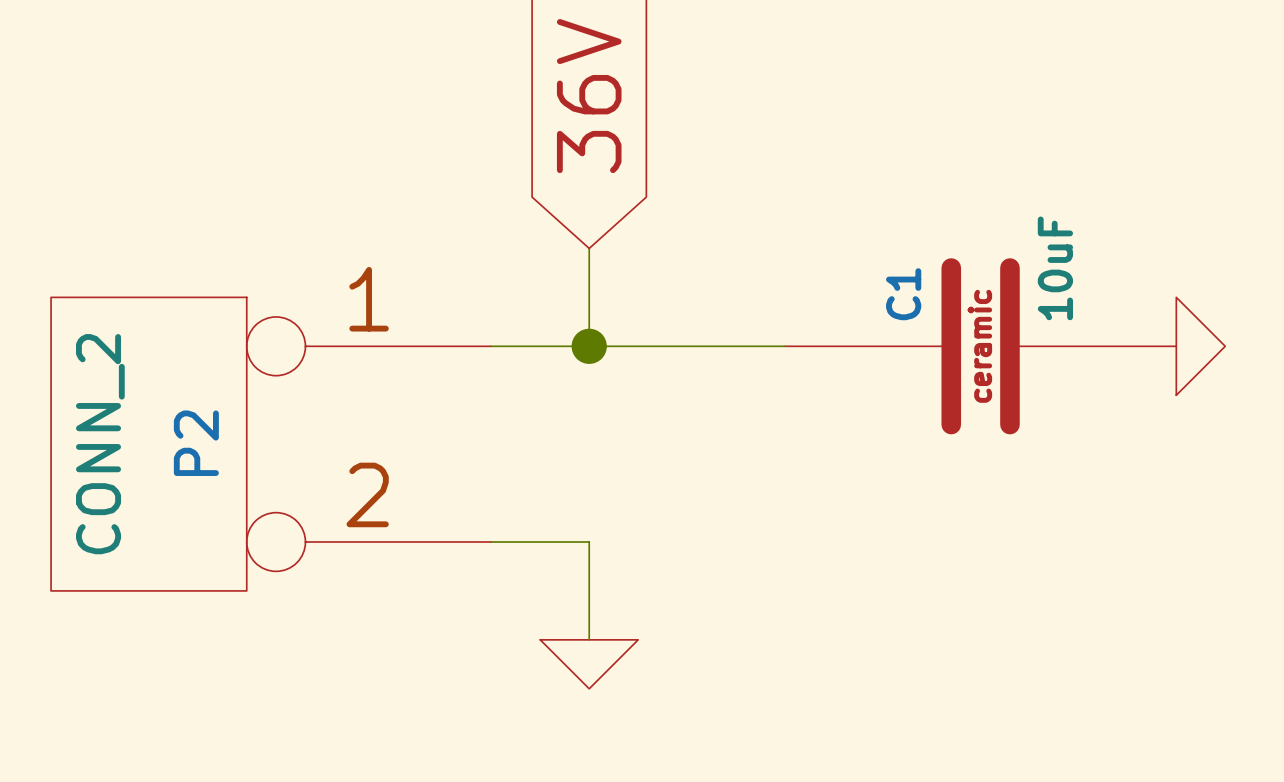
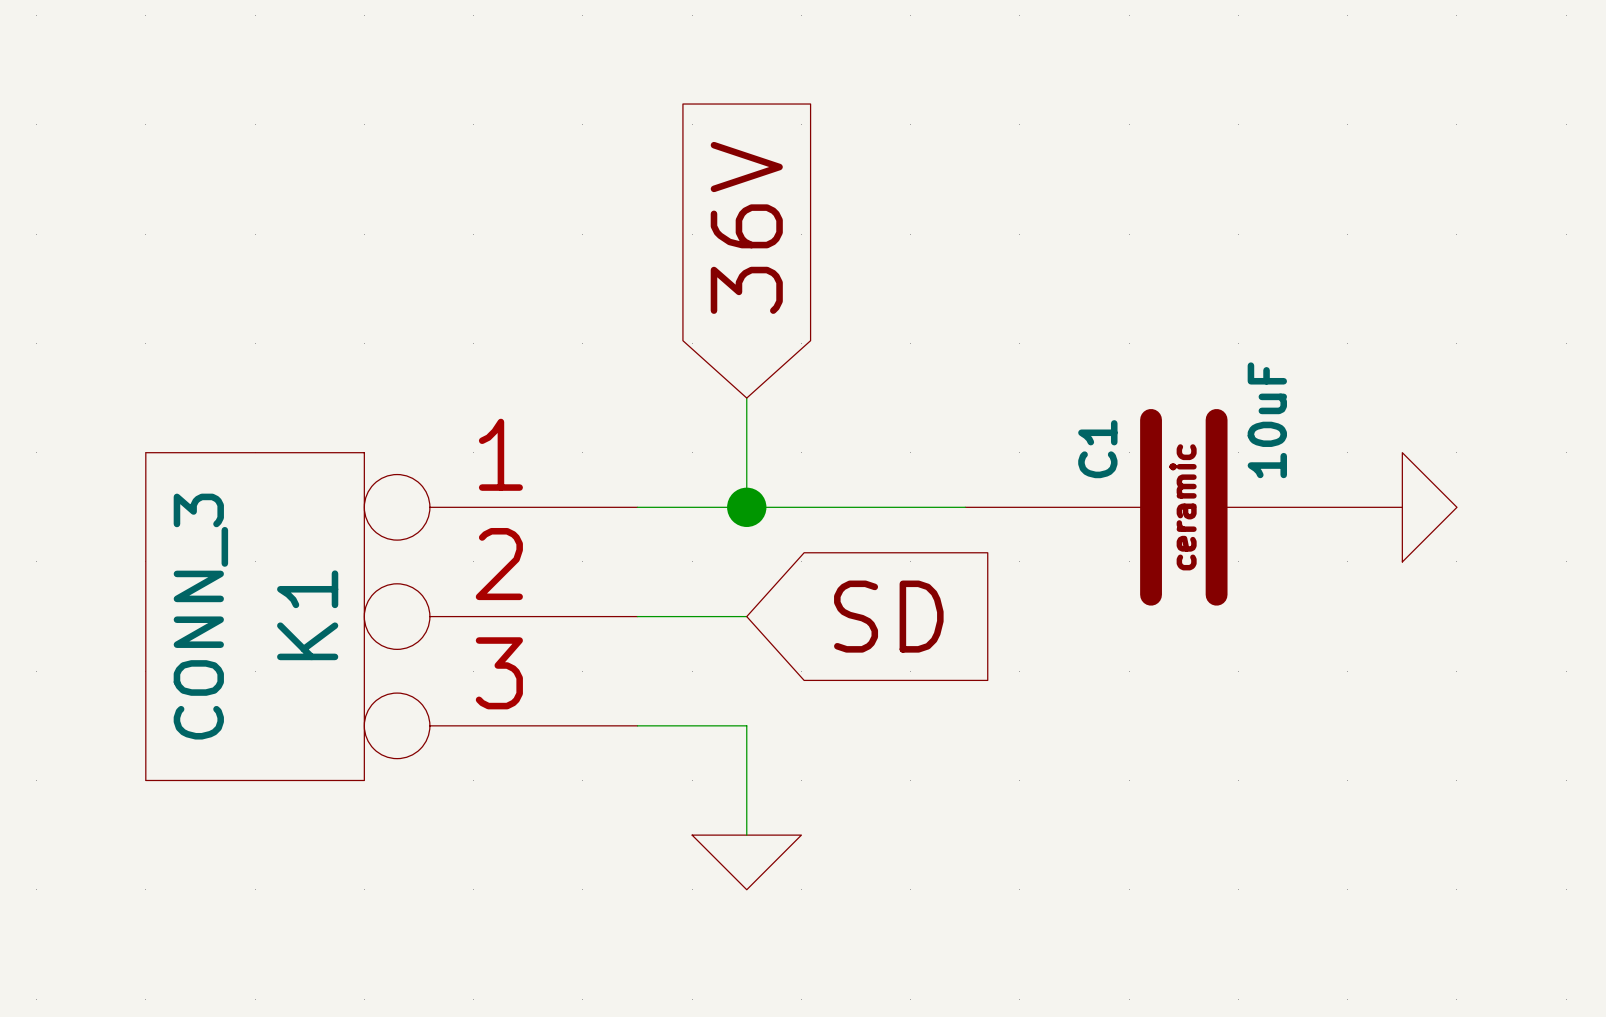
P2: CONN_2 (271, 444) -> none
K1: none -> CONN_3 (391, 616)
wire: none -> (637, 616) (746, 616)
global label: none -> SD (888, 616)

